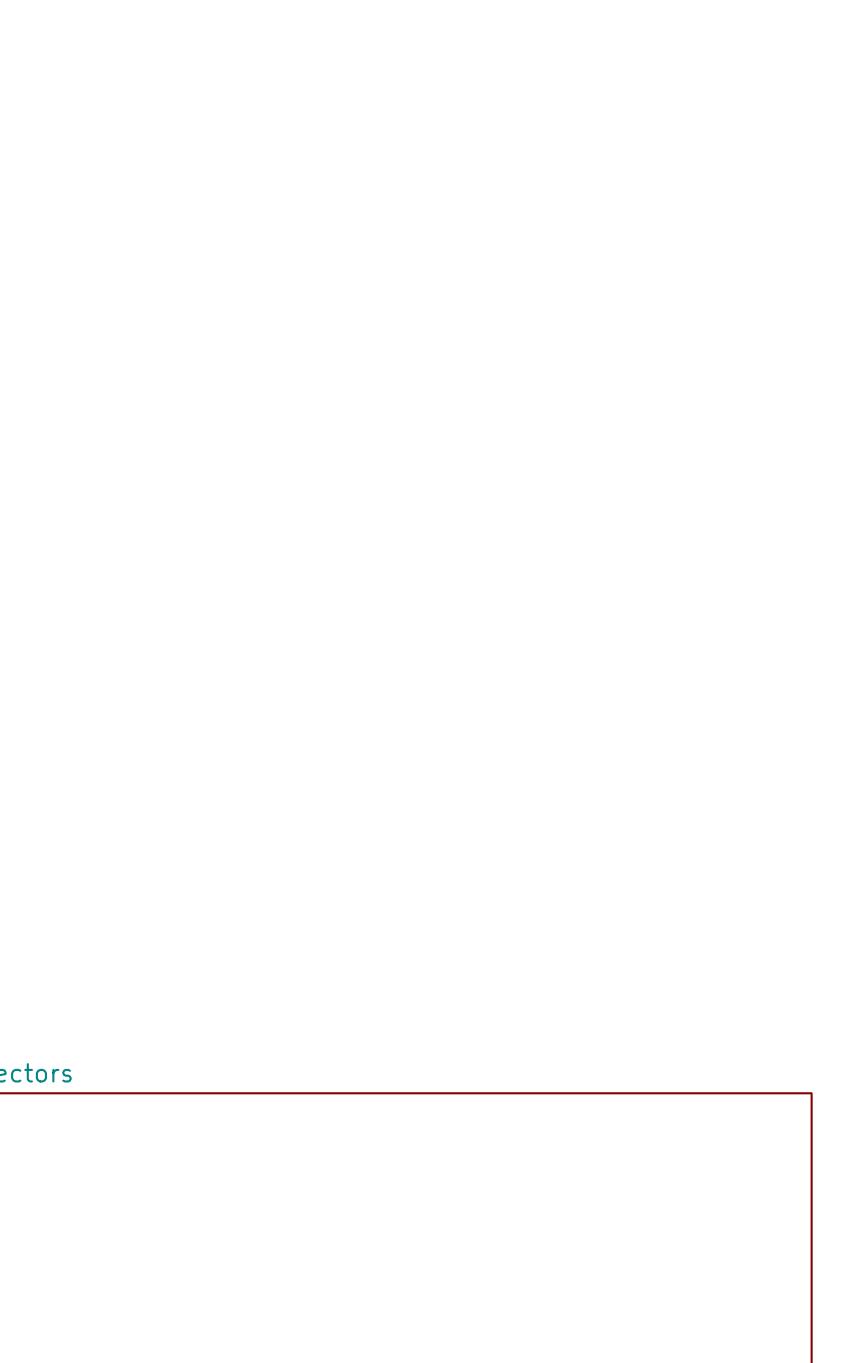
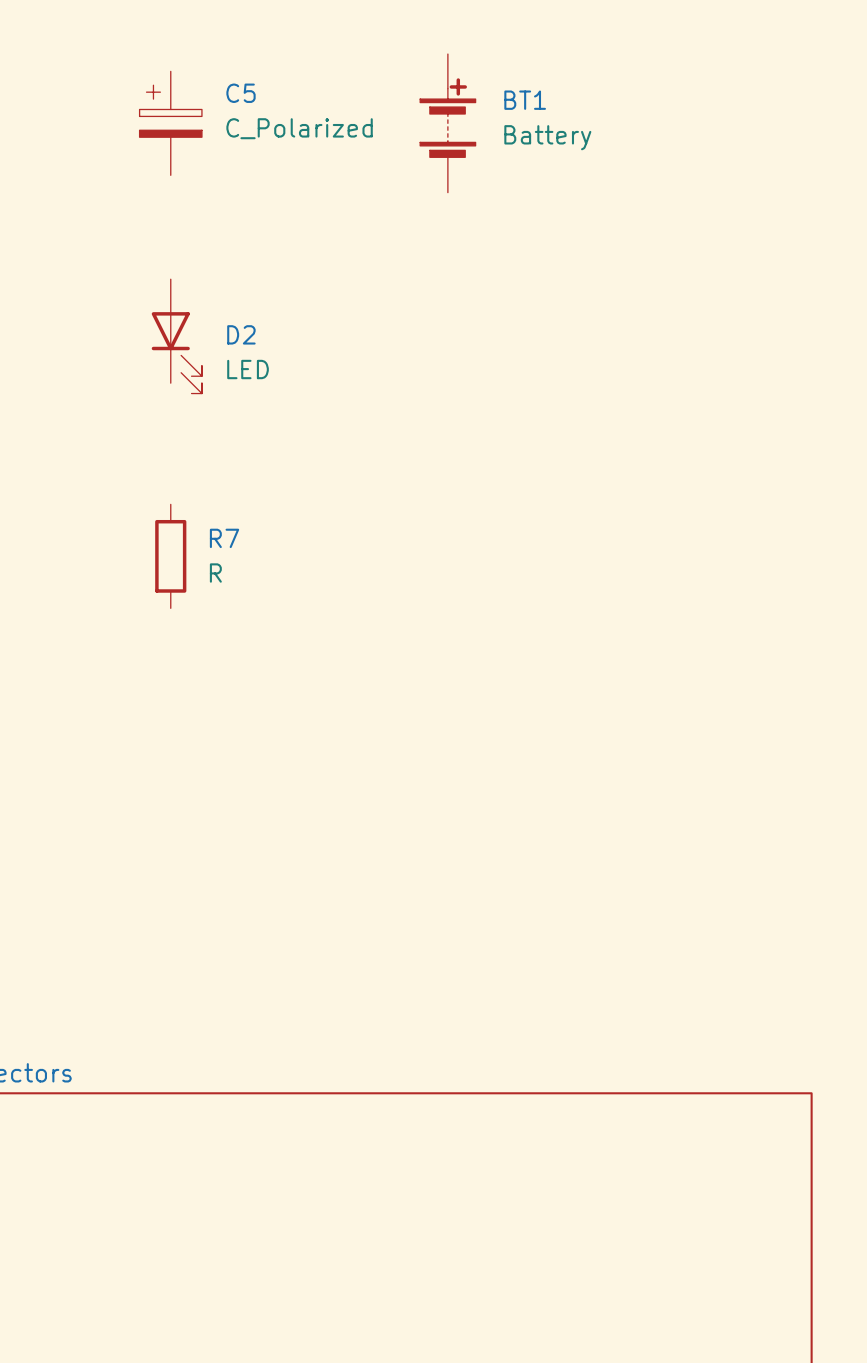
C5: none -> C_Polarized (170, 123)
BT1: none -> Battery (447, 123)
D2: none -> LED (176, 336)
R7: none -> R (170, 556)

